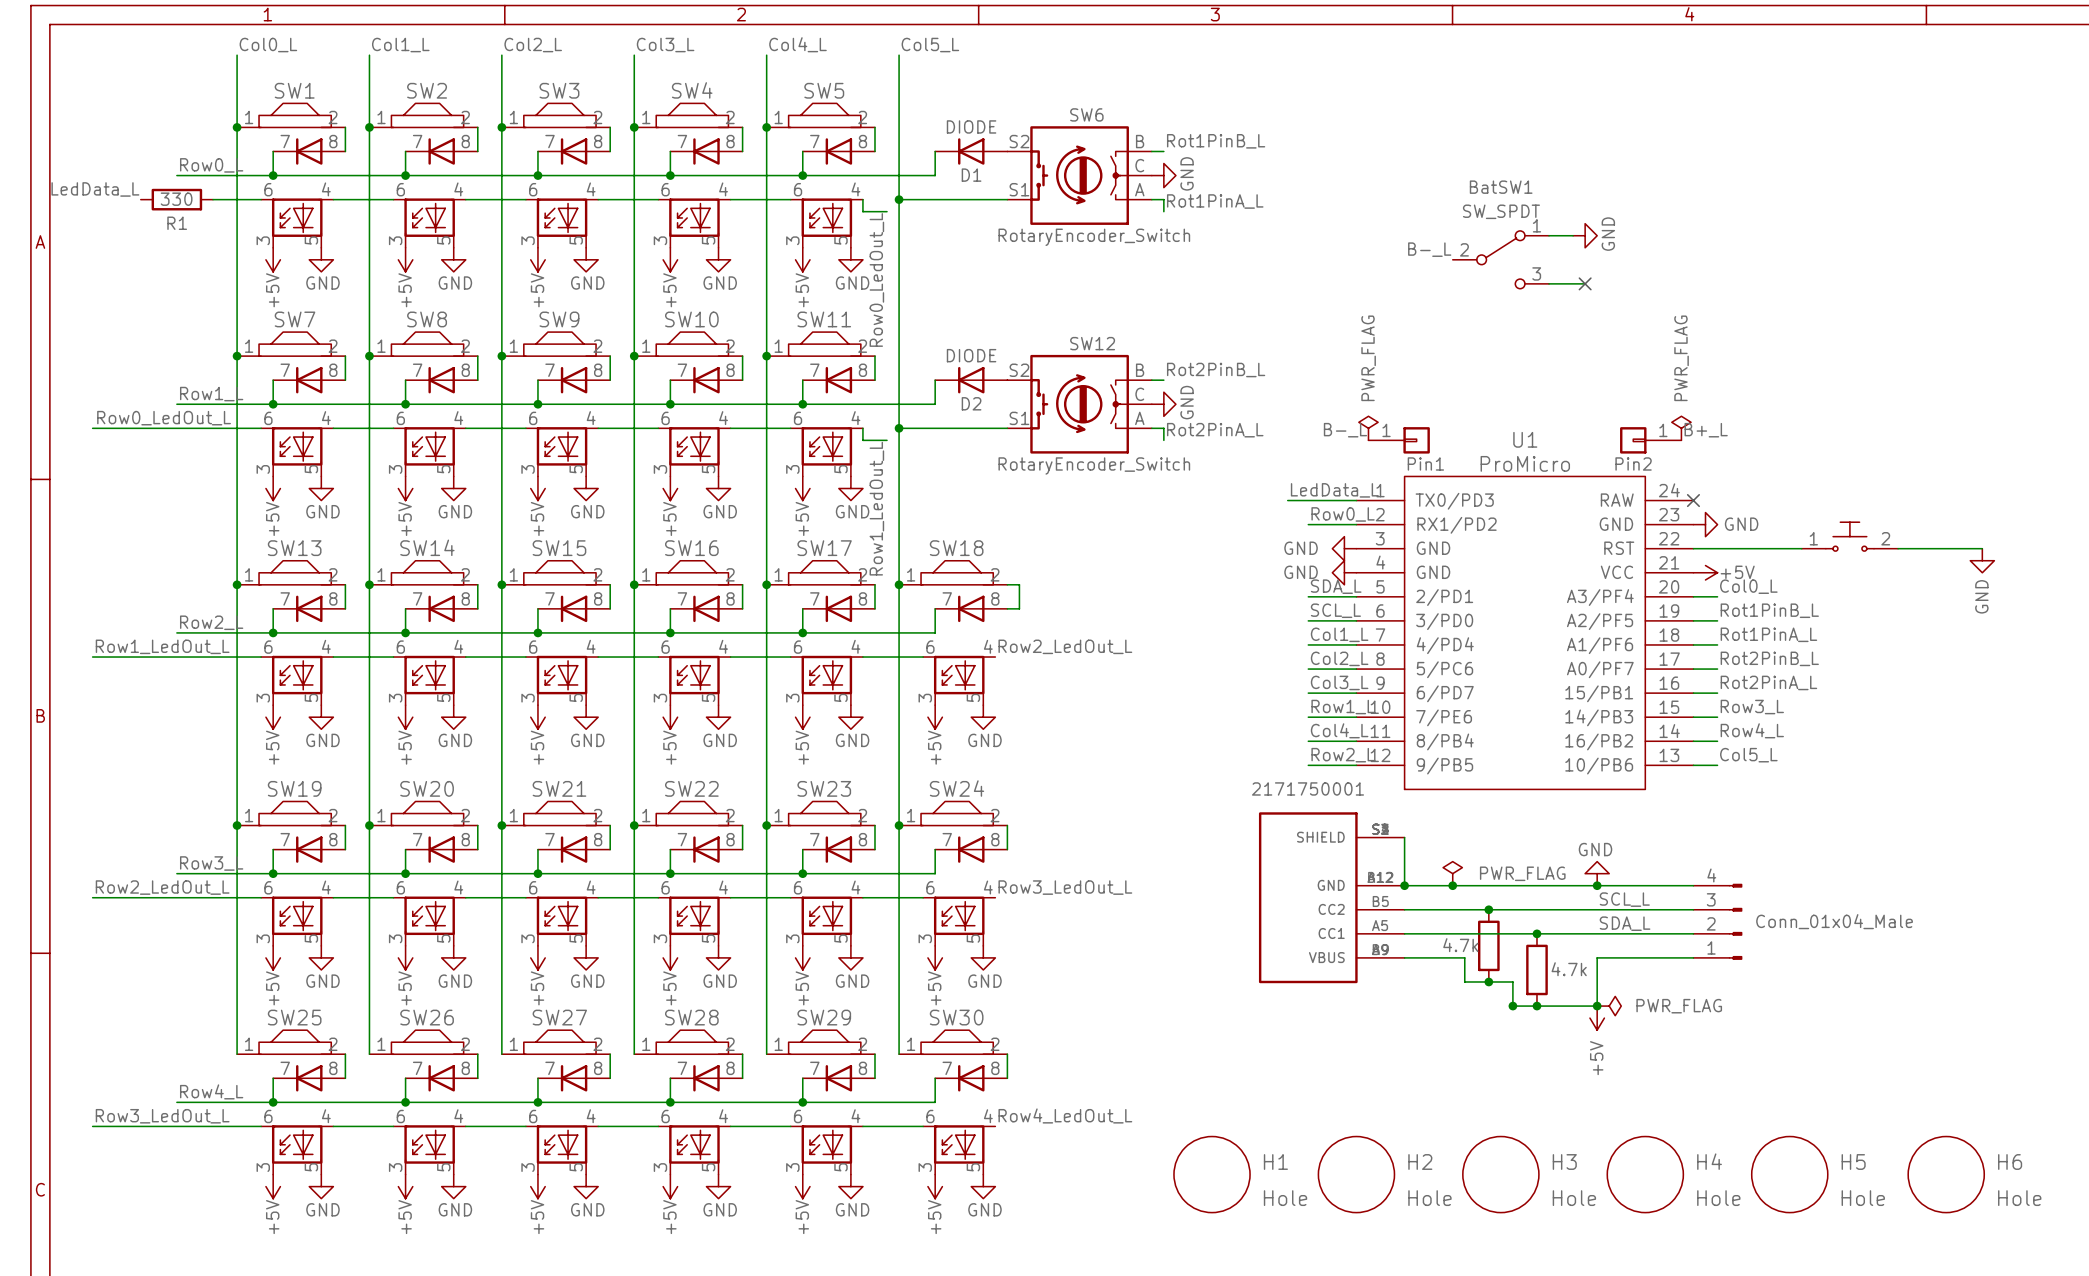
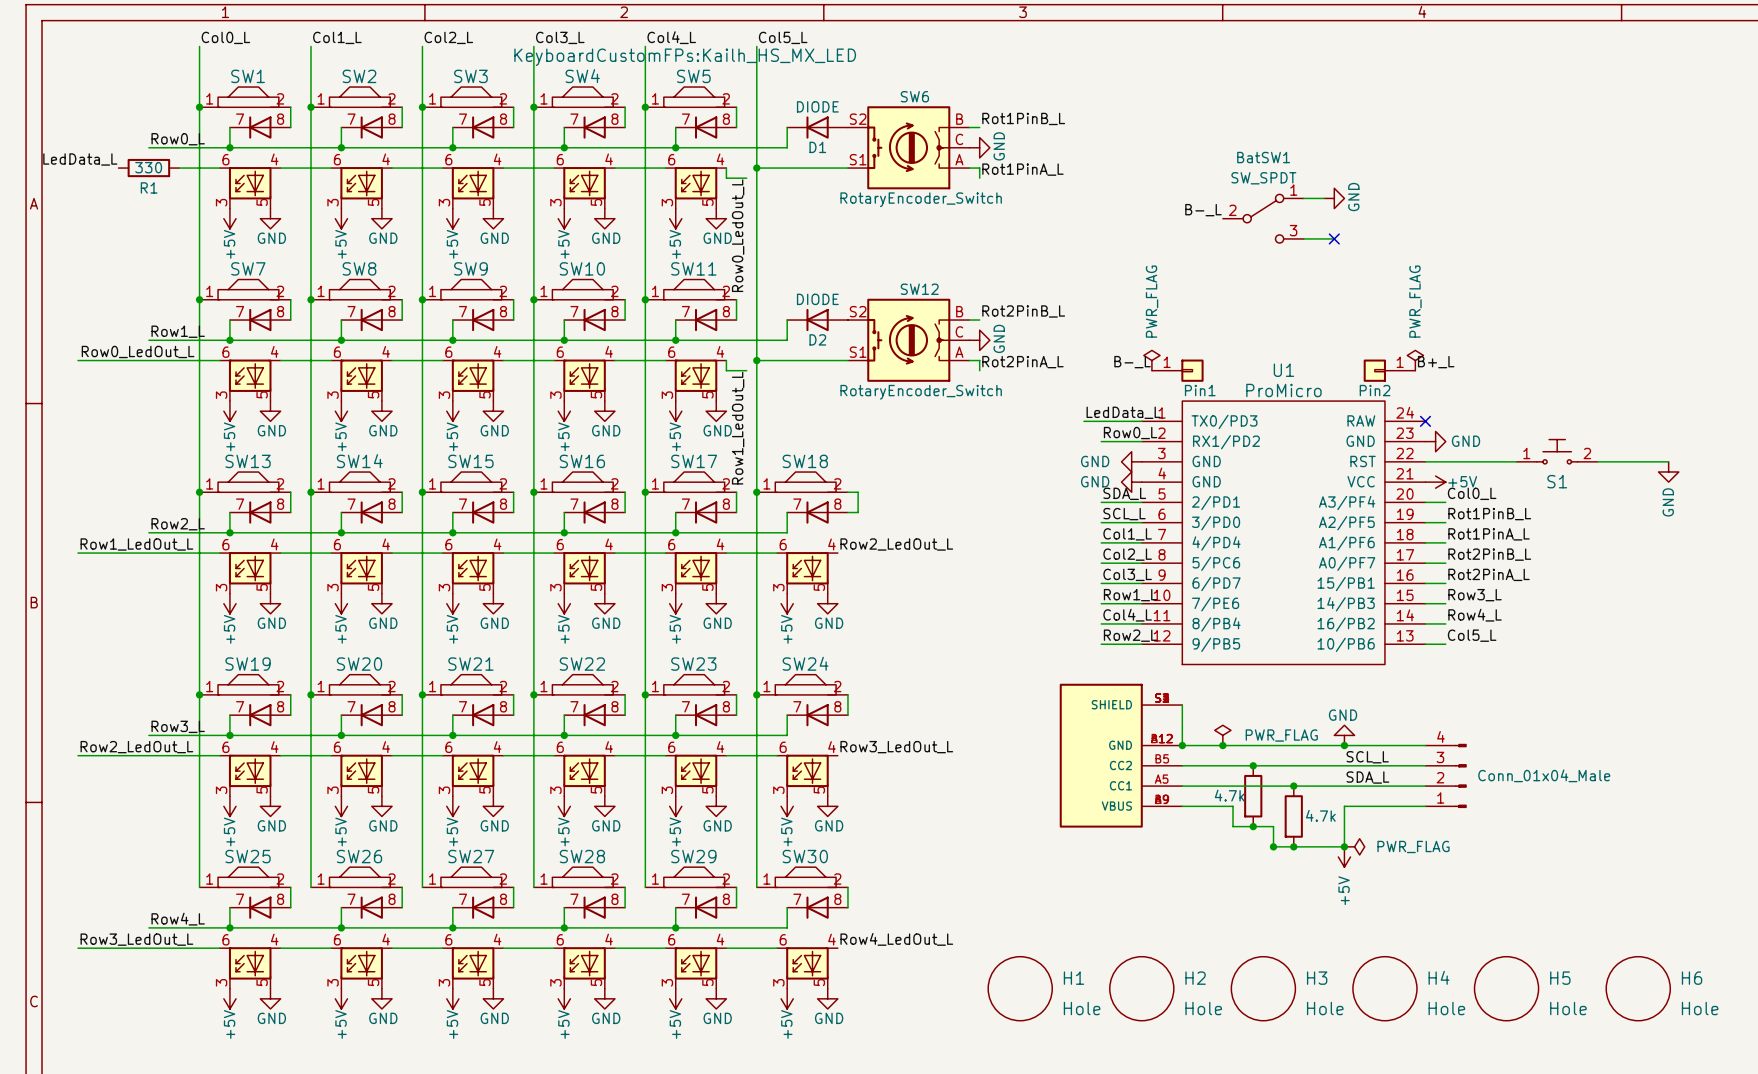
SW5 text: none -> KeyboardCustomFPs:Kailh_HS_MX_LED (685, 57)
S1 name: none -> S1 (1557, 481)
part value: 2171750001 (1308, 788) -> none

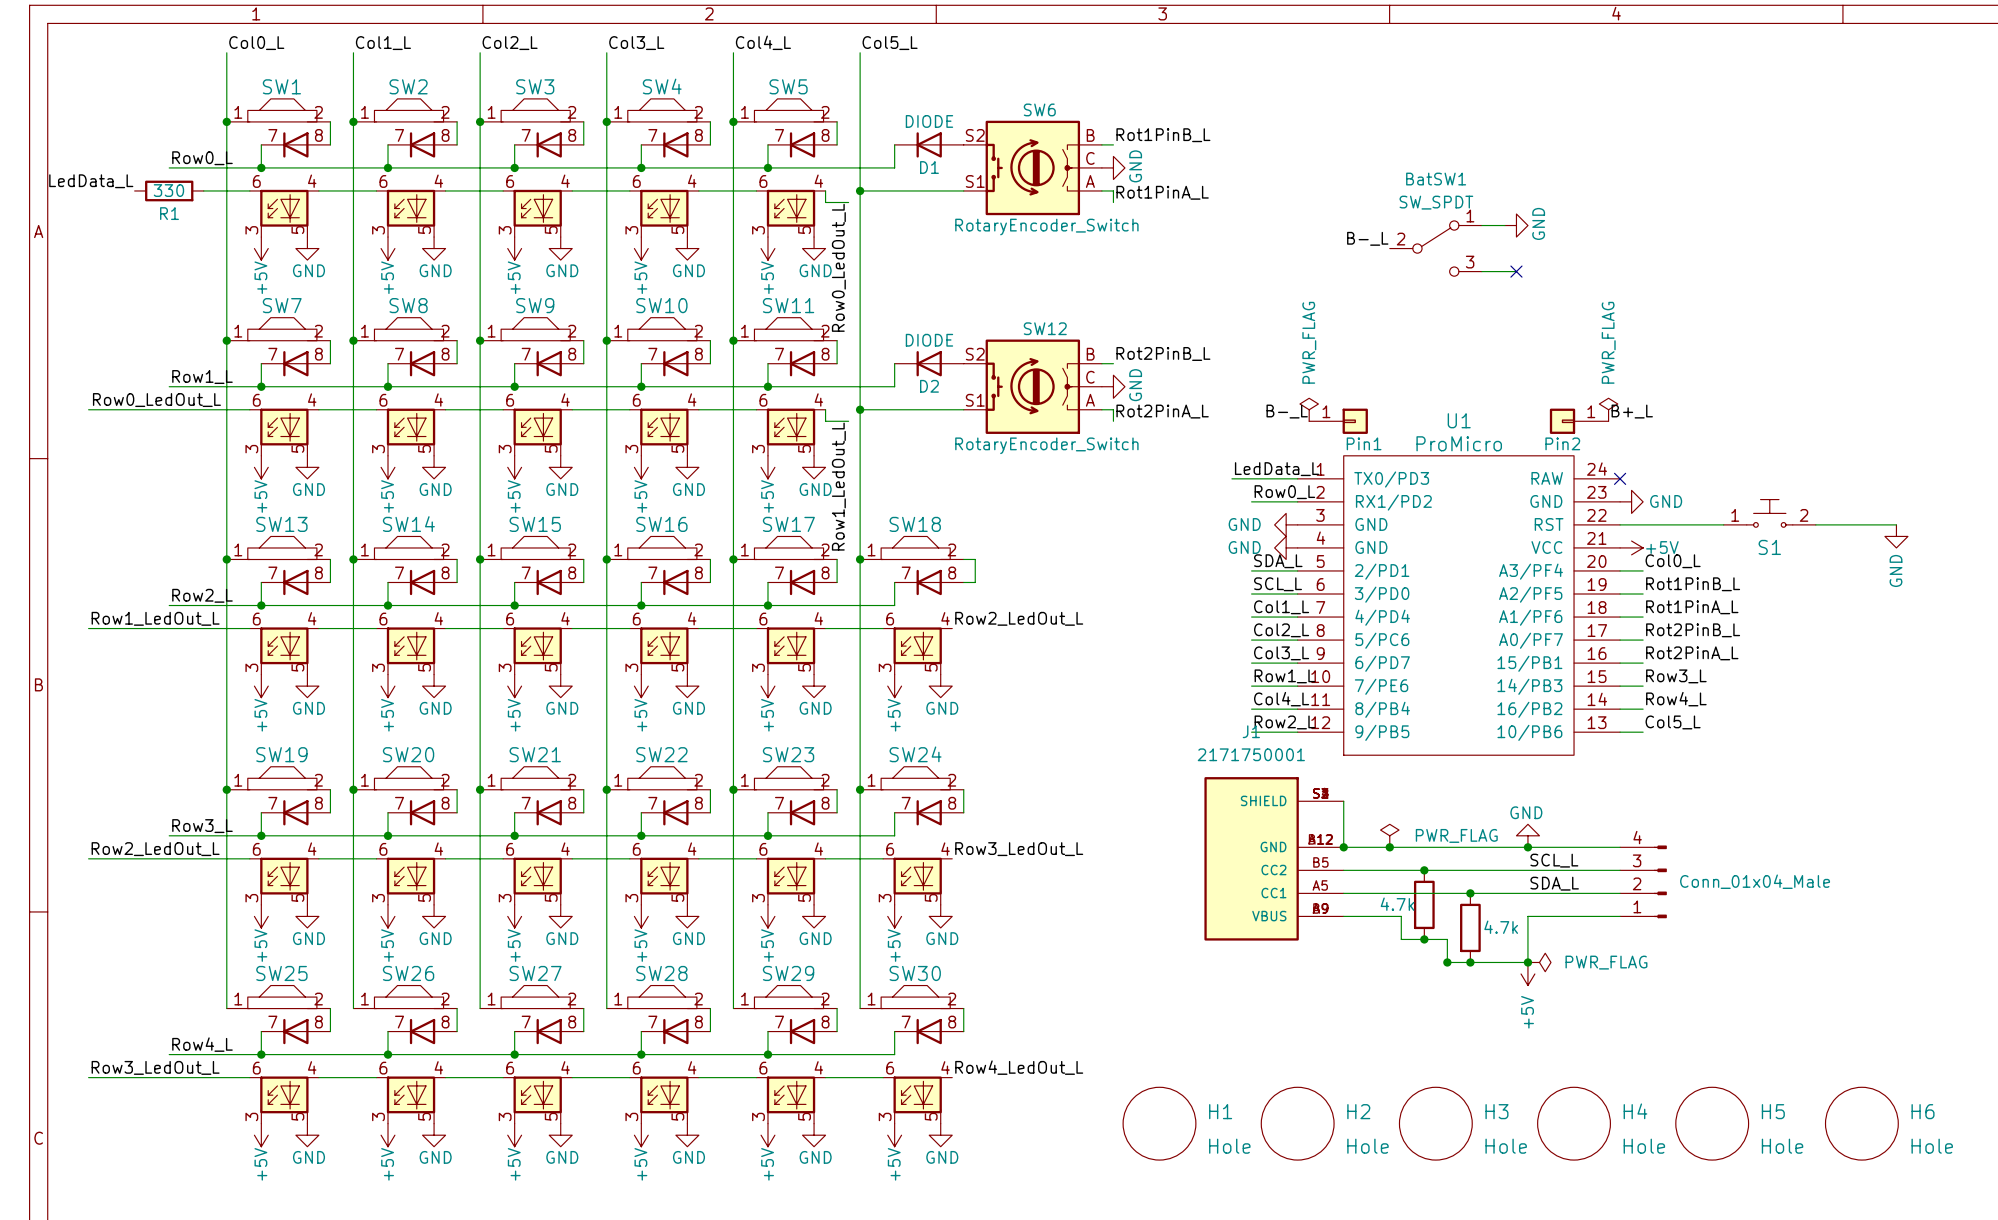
SW5 text: KeyboardCustomFPs:Kailh_HS_MX_LED (685, 57) -> none
J1 name: none -> J1 (1251, 731)
J1 value: none -> 2171750001 (1251, 754)

